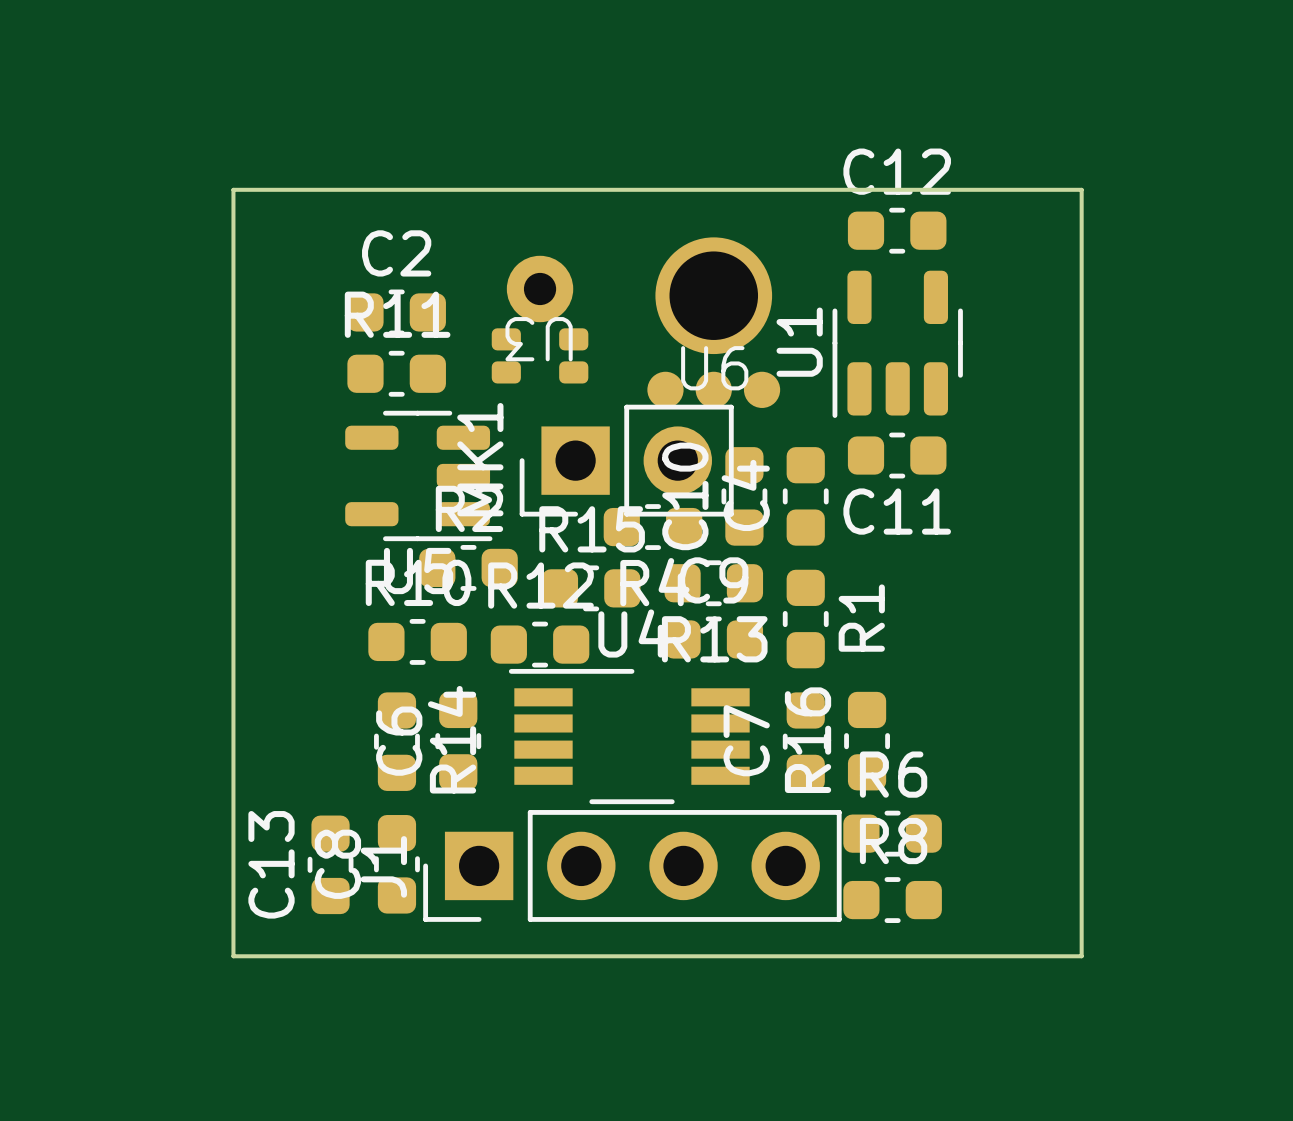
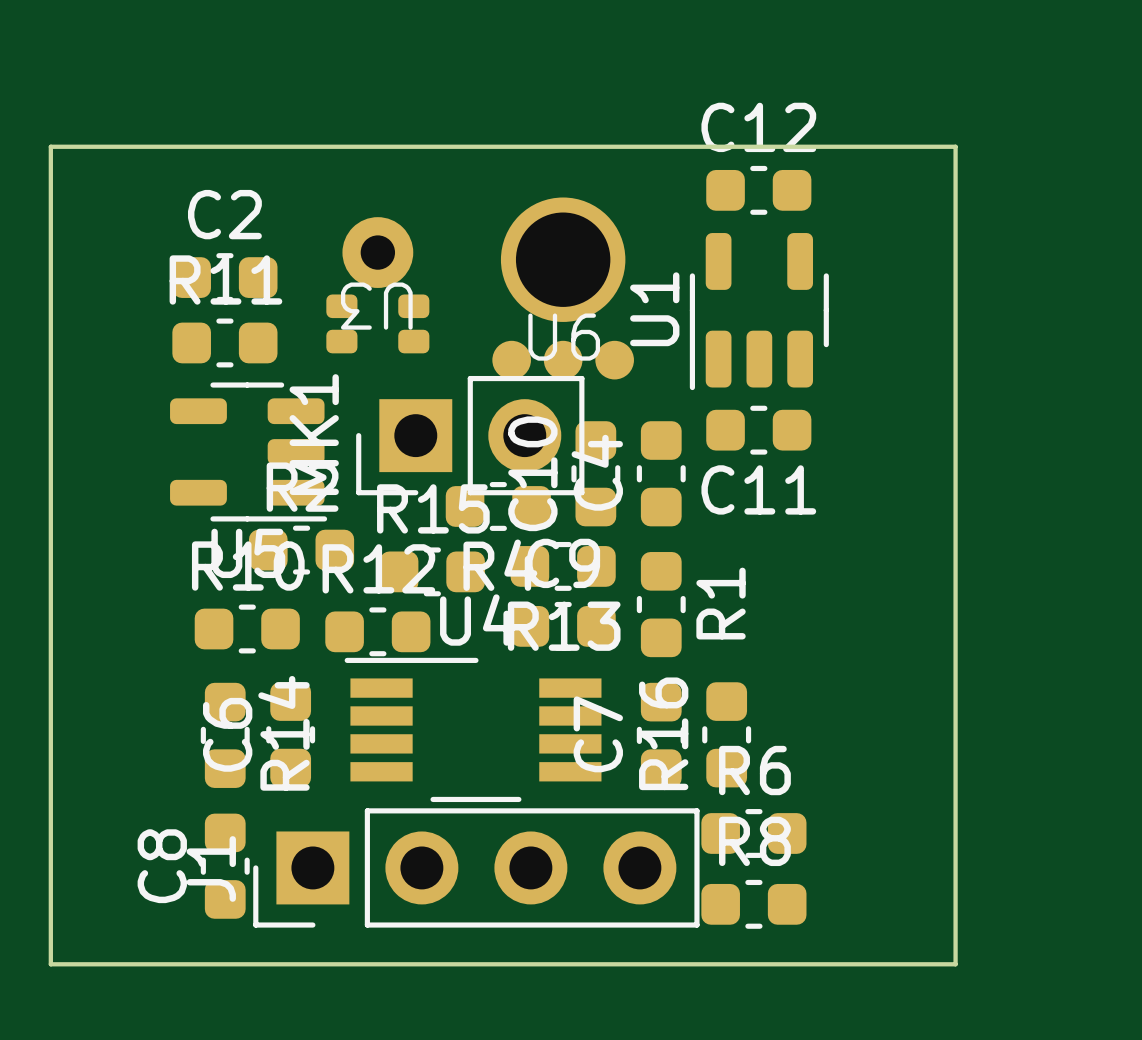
C13: (330, 864) -> none

